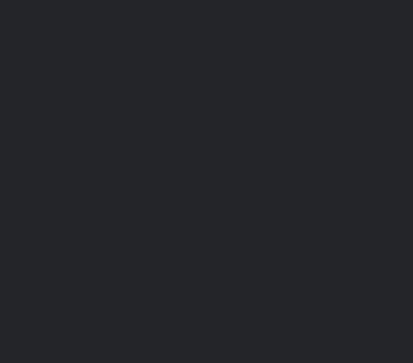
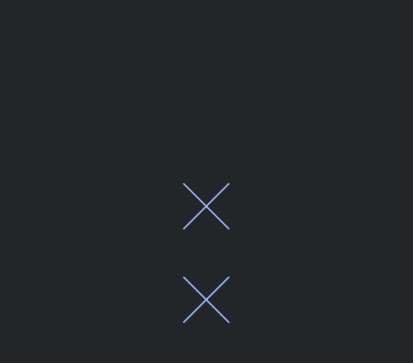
no-connect mark: none -> (206, 206)
no-connect mark: none -> (206, 299)

